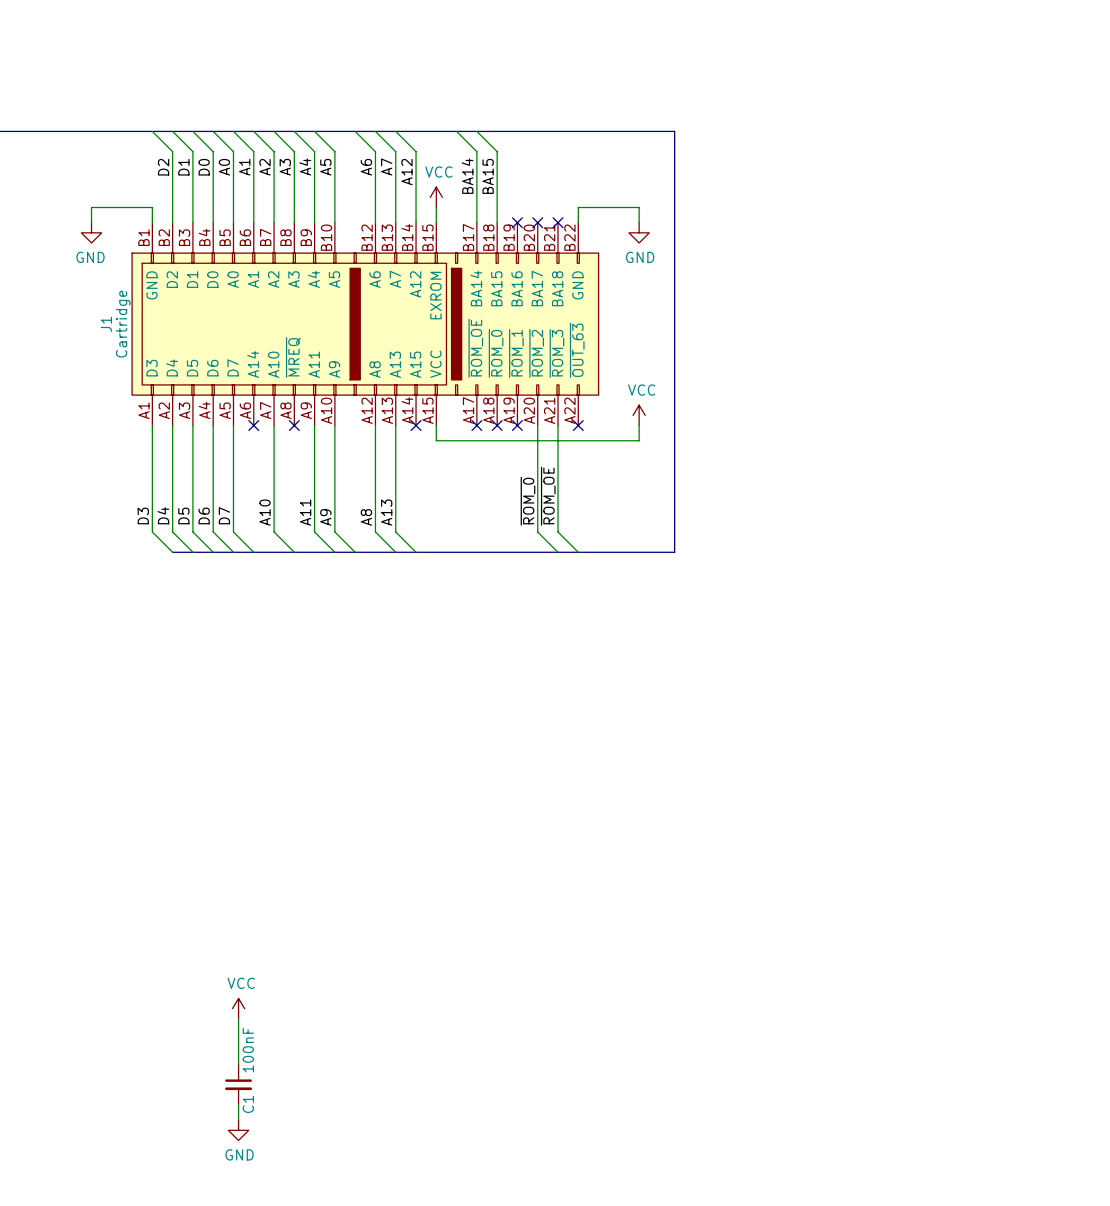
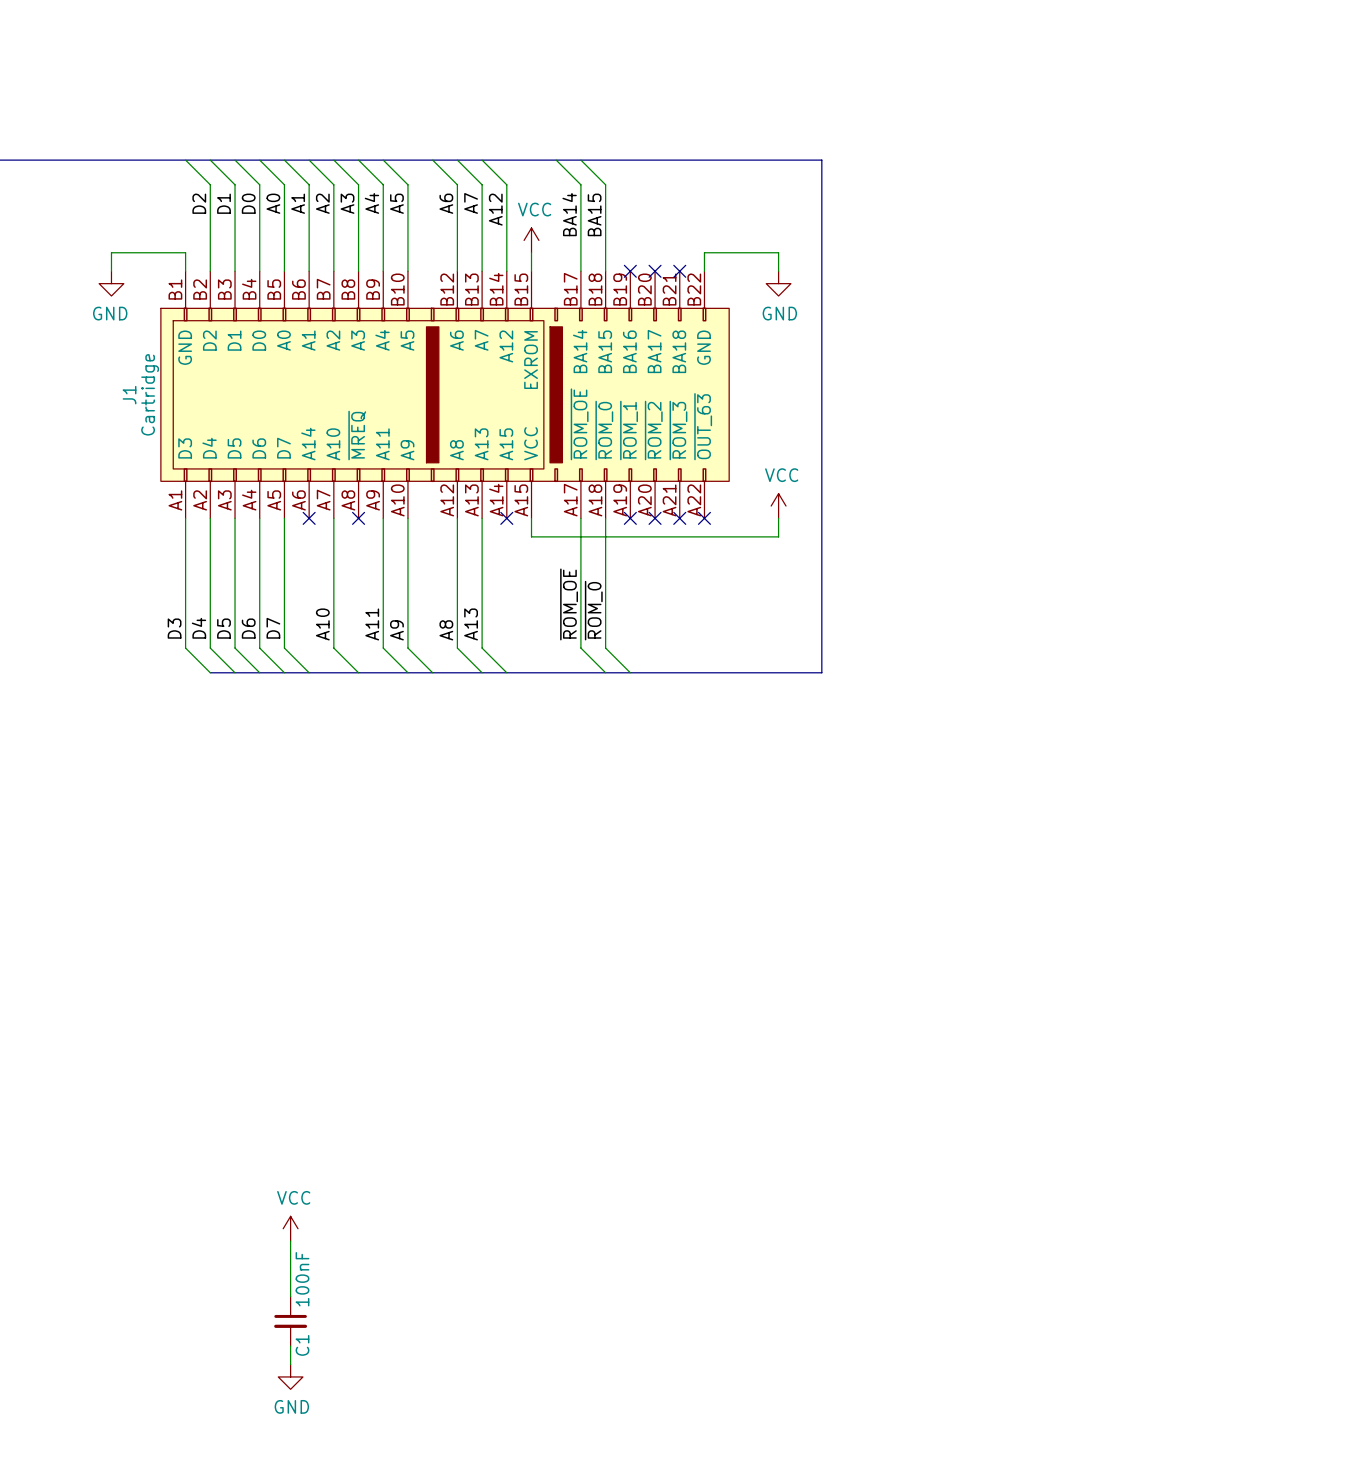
no-connect mark: (476, 425) -> none
no-connect mark: (497, 425) -> none
wire: (537, 425) (537, 532) (558, 552) -> (605, 518) (605, 648) (630, 672)
no-connect mark: none -> (655, 518)
wire: (558, 425) (558, 532) (578, 552) -> (580, 518) (580, 648) (605, 672)
no-connect mark: none -> (679, 518)
label position: ~{ROM_OE} (548, 496) -> ~{ROM_OE} (569, 604)
label position: ~{ROM_0} (527, 501) -> ~{ROM_0} (593, 610)

